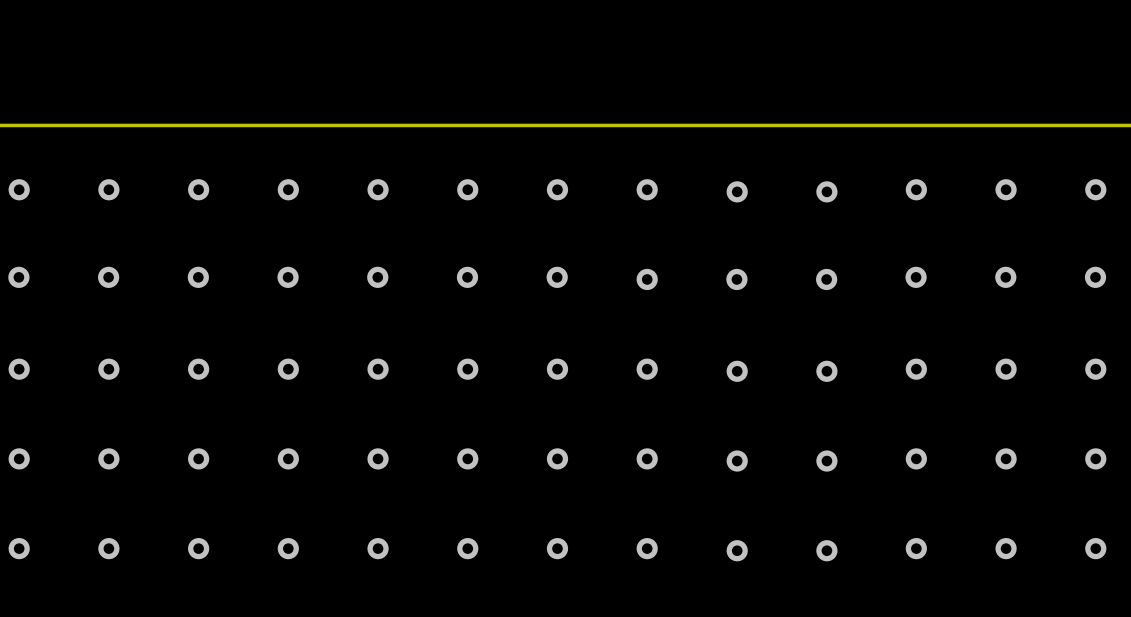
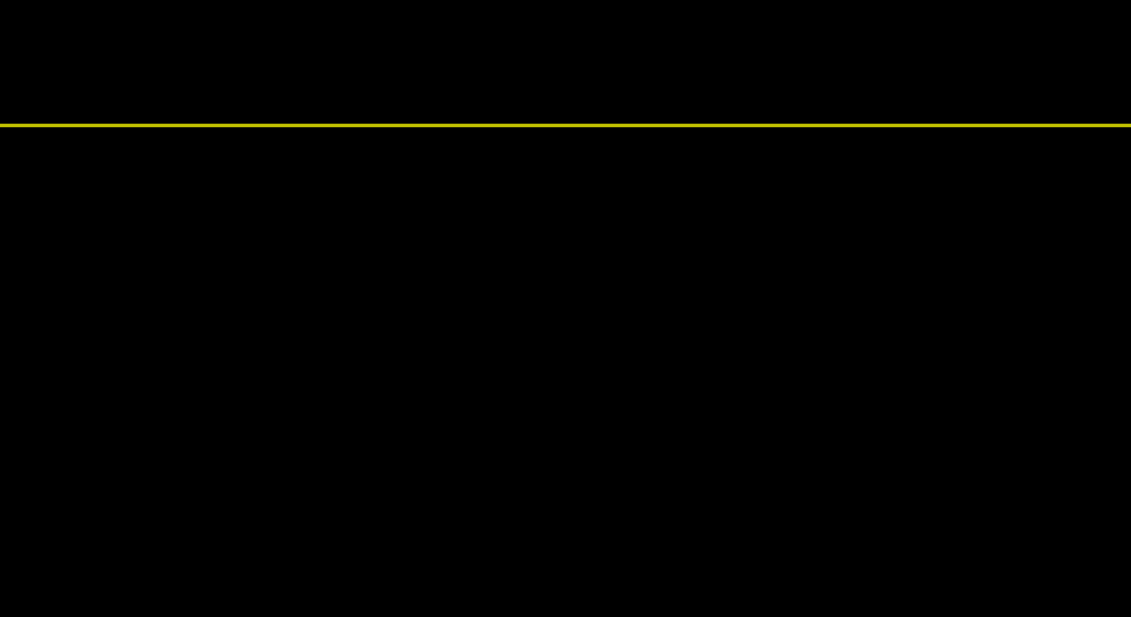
via: (19, 189) -> none
via: (108, 189) -> none
via: (198, 189) -> none
via: (288, 189) -> none
via: (378, 189) -> none
via: (467, 189) -> none
via: (557, 189) -> none
via: (647, 189) -> none
via: (916, 189) -> none
via: (1006, 189) -> none
via: (1095, 189) -> none
via: (737, 191) -> none
via: (826, 191) -> none
via: (18, 277) -> none
via: (108, 277) -> none
via: (198, 277) -> none
via: (288, 277) -> none
via: (377, 277) -> none
via: (467, 277) -> none
via: (557, 277) -> none
via: (916, 277) -> none
via: (1005, 277) -> none
via: (1095, 277) -> none
via: (647, 279) -> none
via: (736, 279) -> none
via: (826, 279) -> none
via: (19, 369) -> none
via: (108, 369) -> none
via: (198, 369) -> none
via: (288, 369) -> none
via: (378, 369) -> none
via: (467, 369) -> none
via: (557, 369) -> none
via: (647, 369) -> none
via: (916, 369) -> none
via: (1006, 369) -> none
via: (1095, 369) -> none
via: (737, 371) -> none
via: (826, 371) -> none
via: (19, 458) -> none
via: (108, 458) -> none
via: (198, 458) -> none
via: (288, 458) -> none
via: (378, 458) -> none
via: (467, 458) -> none
via: (557, 458) -> none
via: (647, 458) -> none
via: (916, 458) -> none
via: (1006, 458) -> none
via: (1095, 458) -> none
via: (737, 461) -> none
via: (826, 461) -> none
via: (19, 548) -> none
via: (108, 548) -> none
via: (198, 548) -> none
via: (288, 548) -> none
via: (378, 548) -> none
via: (467, 548) -> none
via: (557, 548) -> none
via: (647, 548) -> none
via: (916, 548) -> none
via: (1006, 548) -> none
via: (1095, 548) -> none
via: (737, 550) -> none
via: (826, 550) -> none

